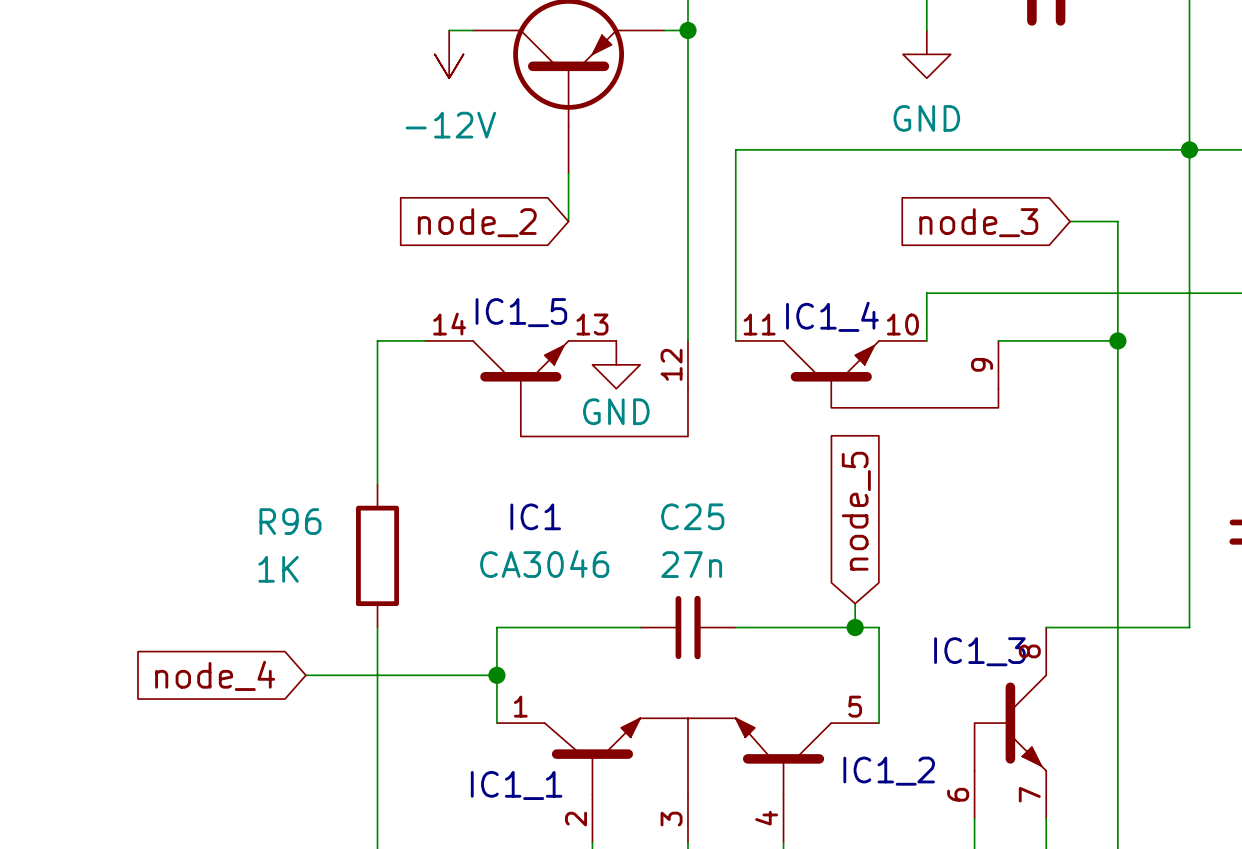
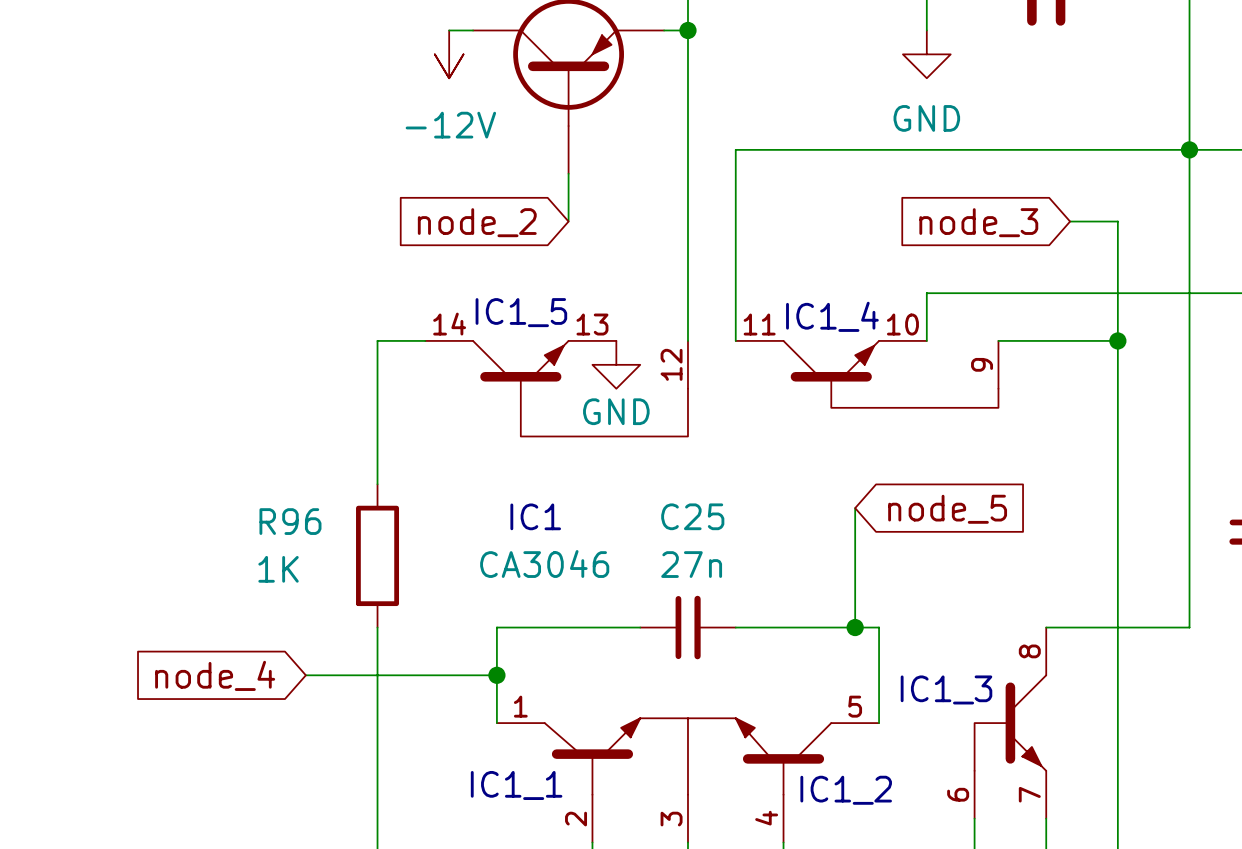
wire: none -> (855, 508) (855, 603)
global label rotation: 0° (856, 511) -> 90° clockwise (947, 509)
text position: IC1_3 (979, 651) -> IC1_3 (946, 689)
text position: IC1_2 (889, 771) -> IC1_2 (846, 790)

